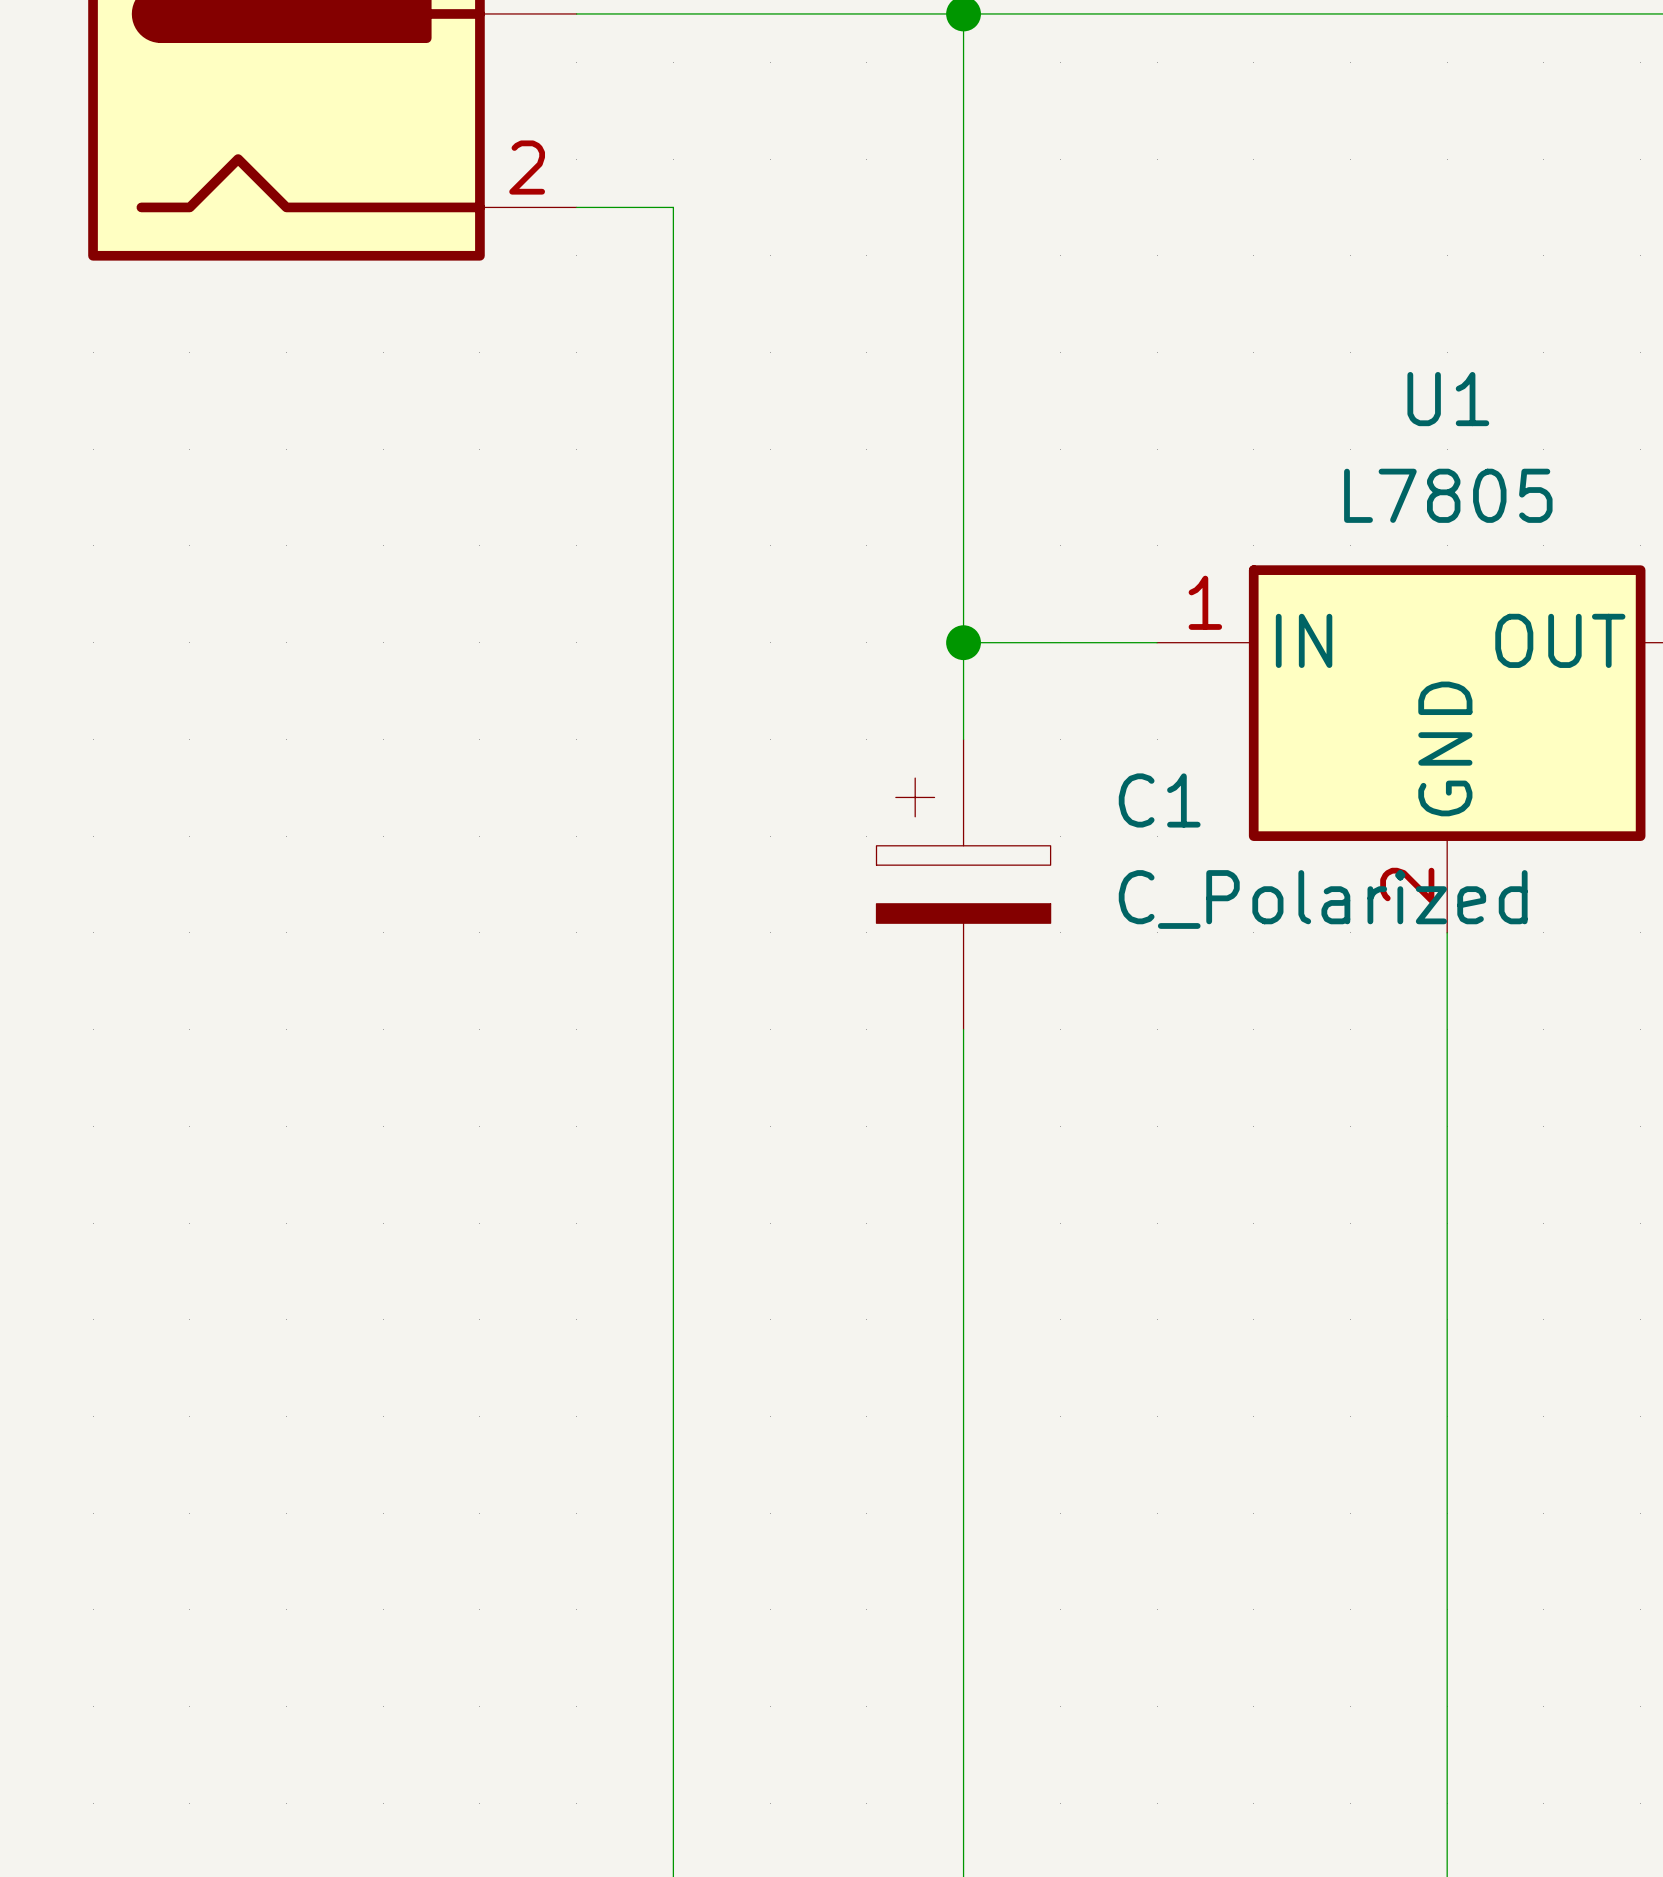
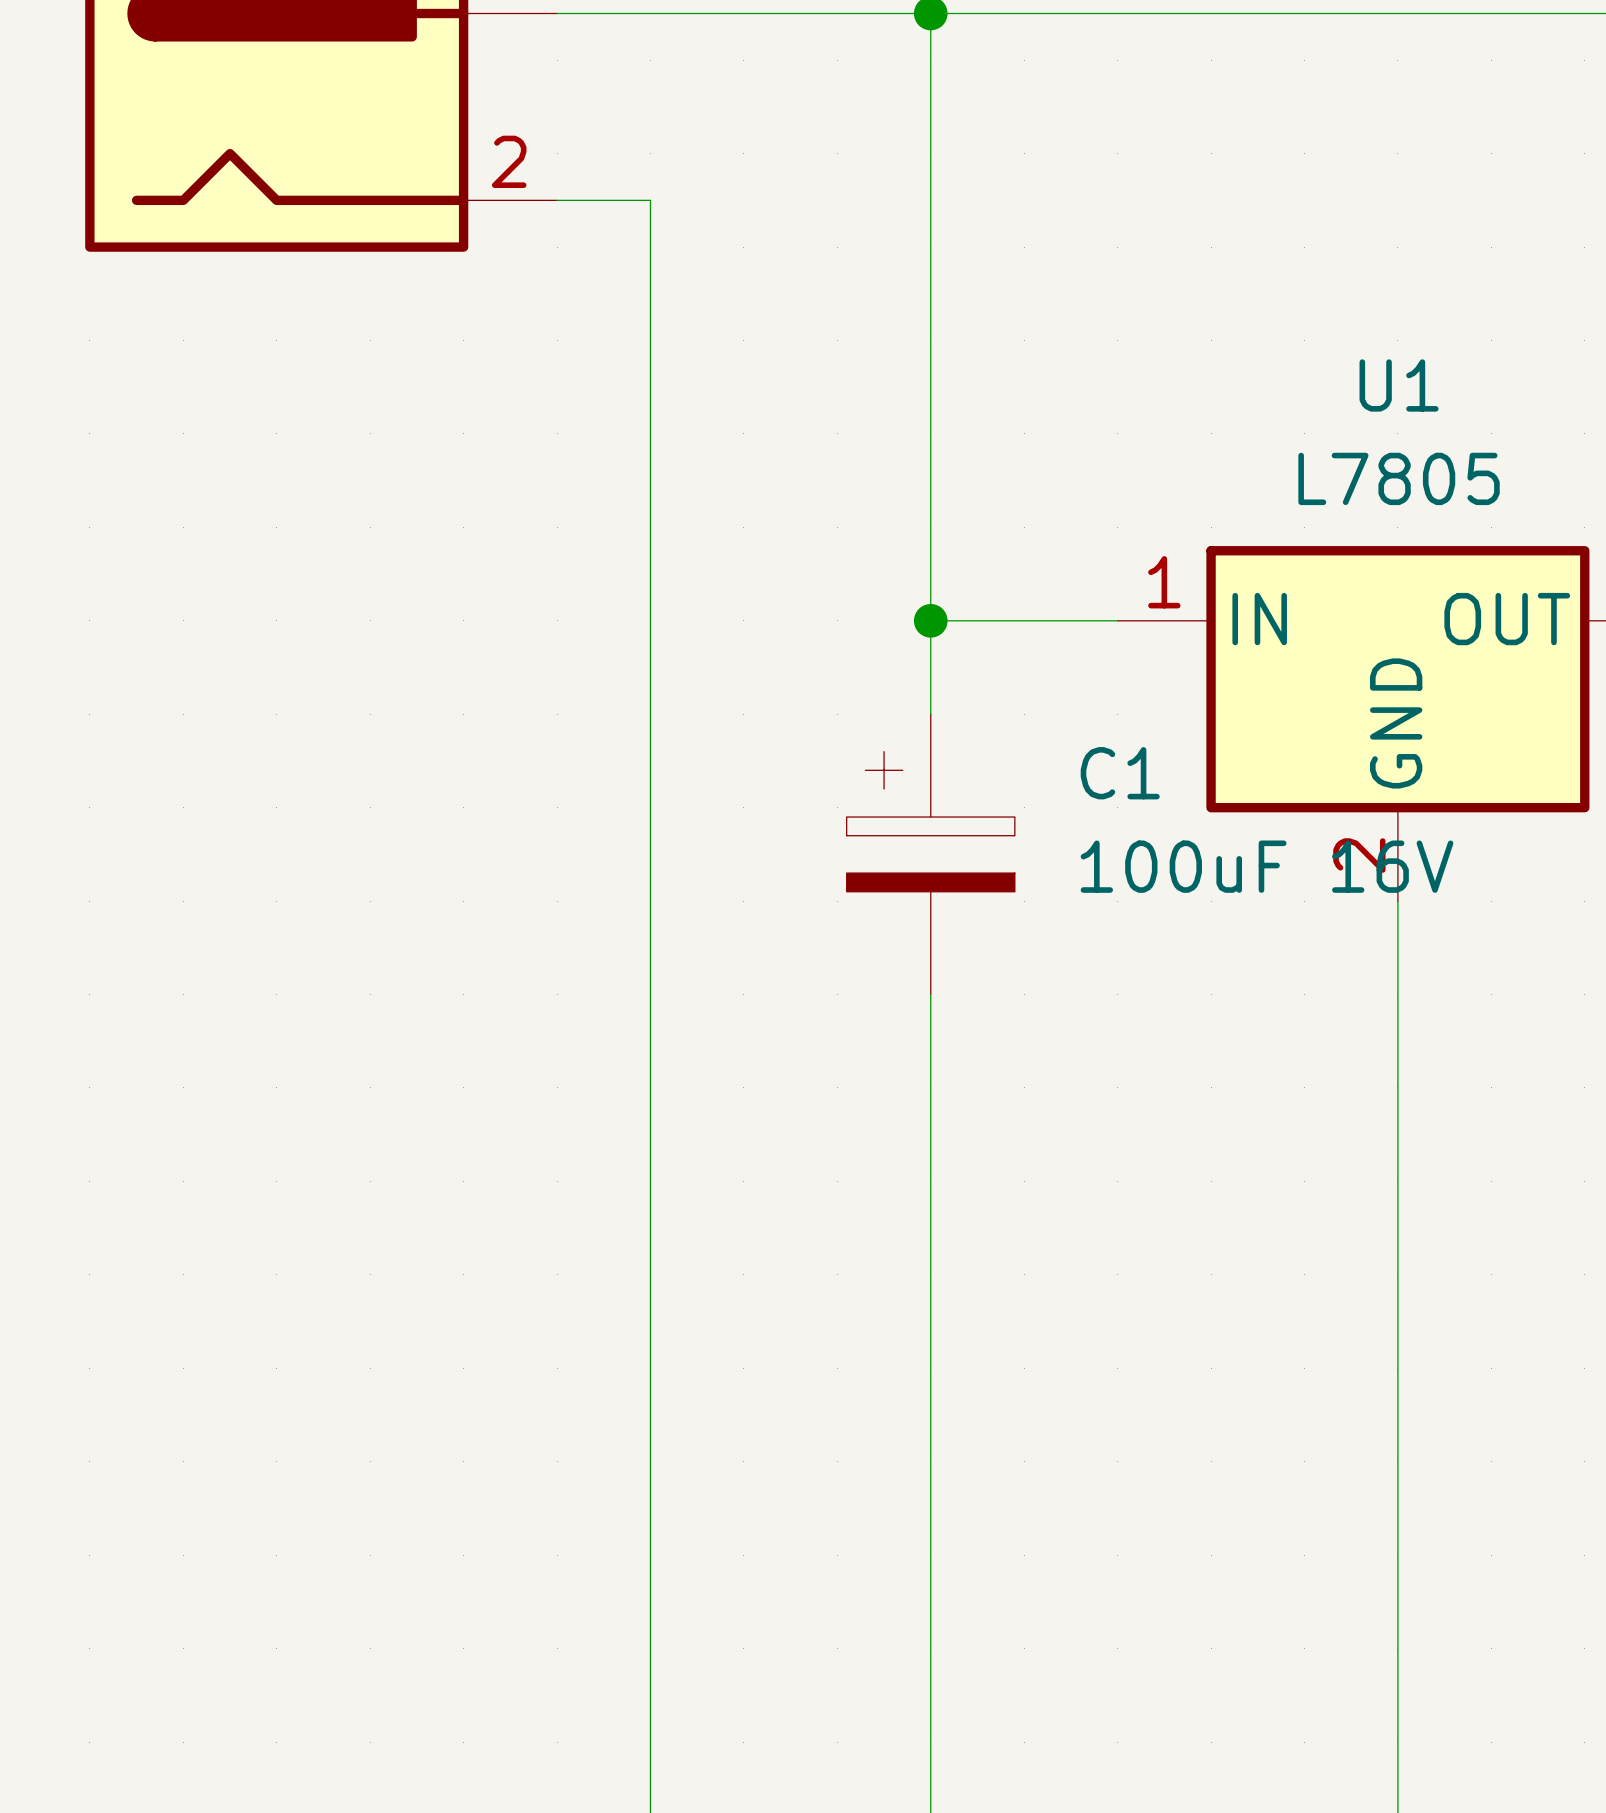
C1 value: C_Polarized (1323, 899) -> 100uF 16V (1267, 866)

